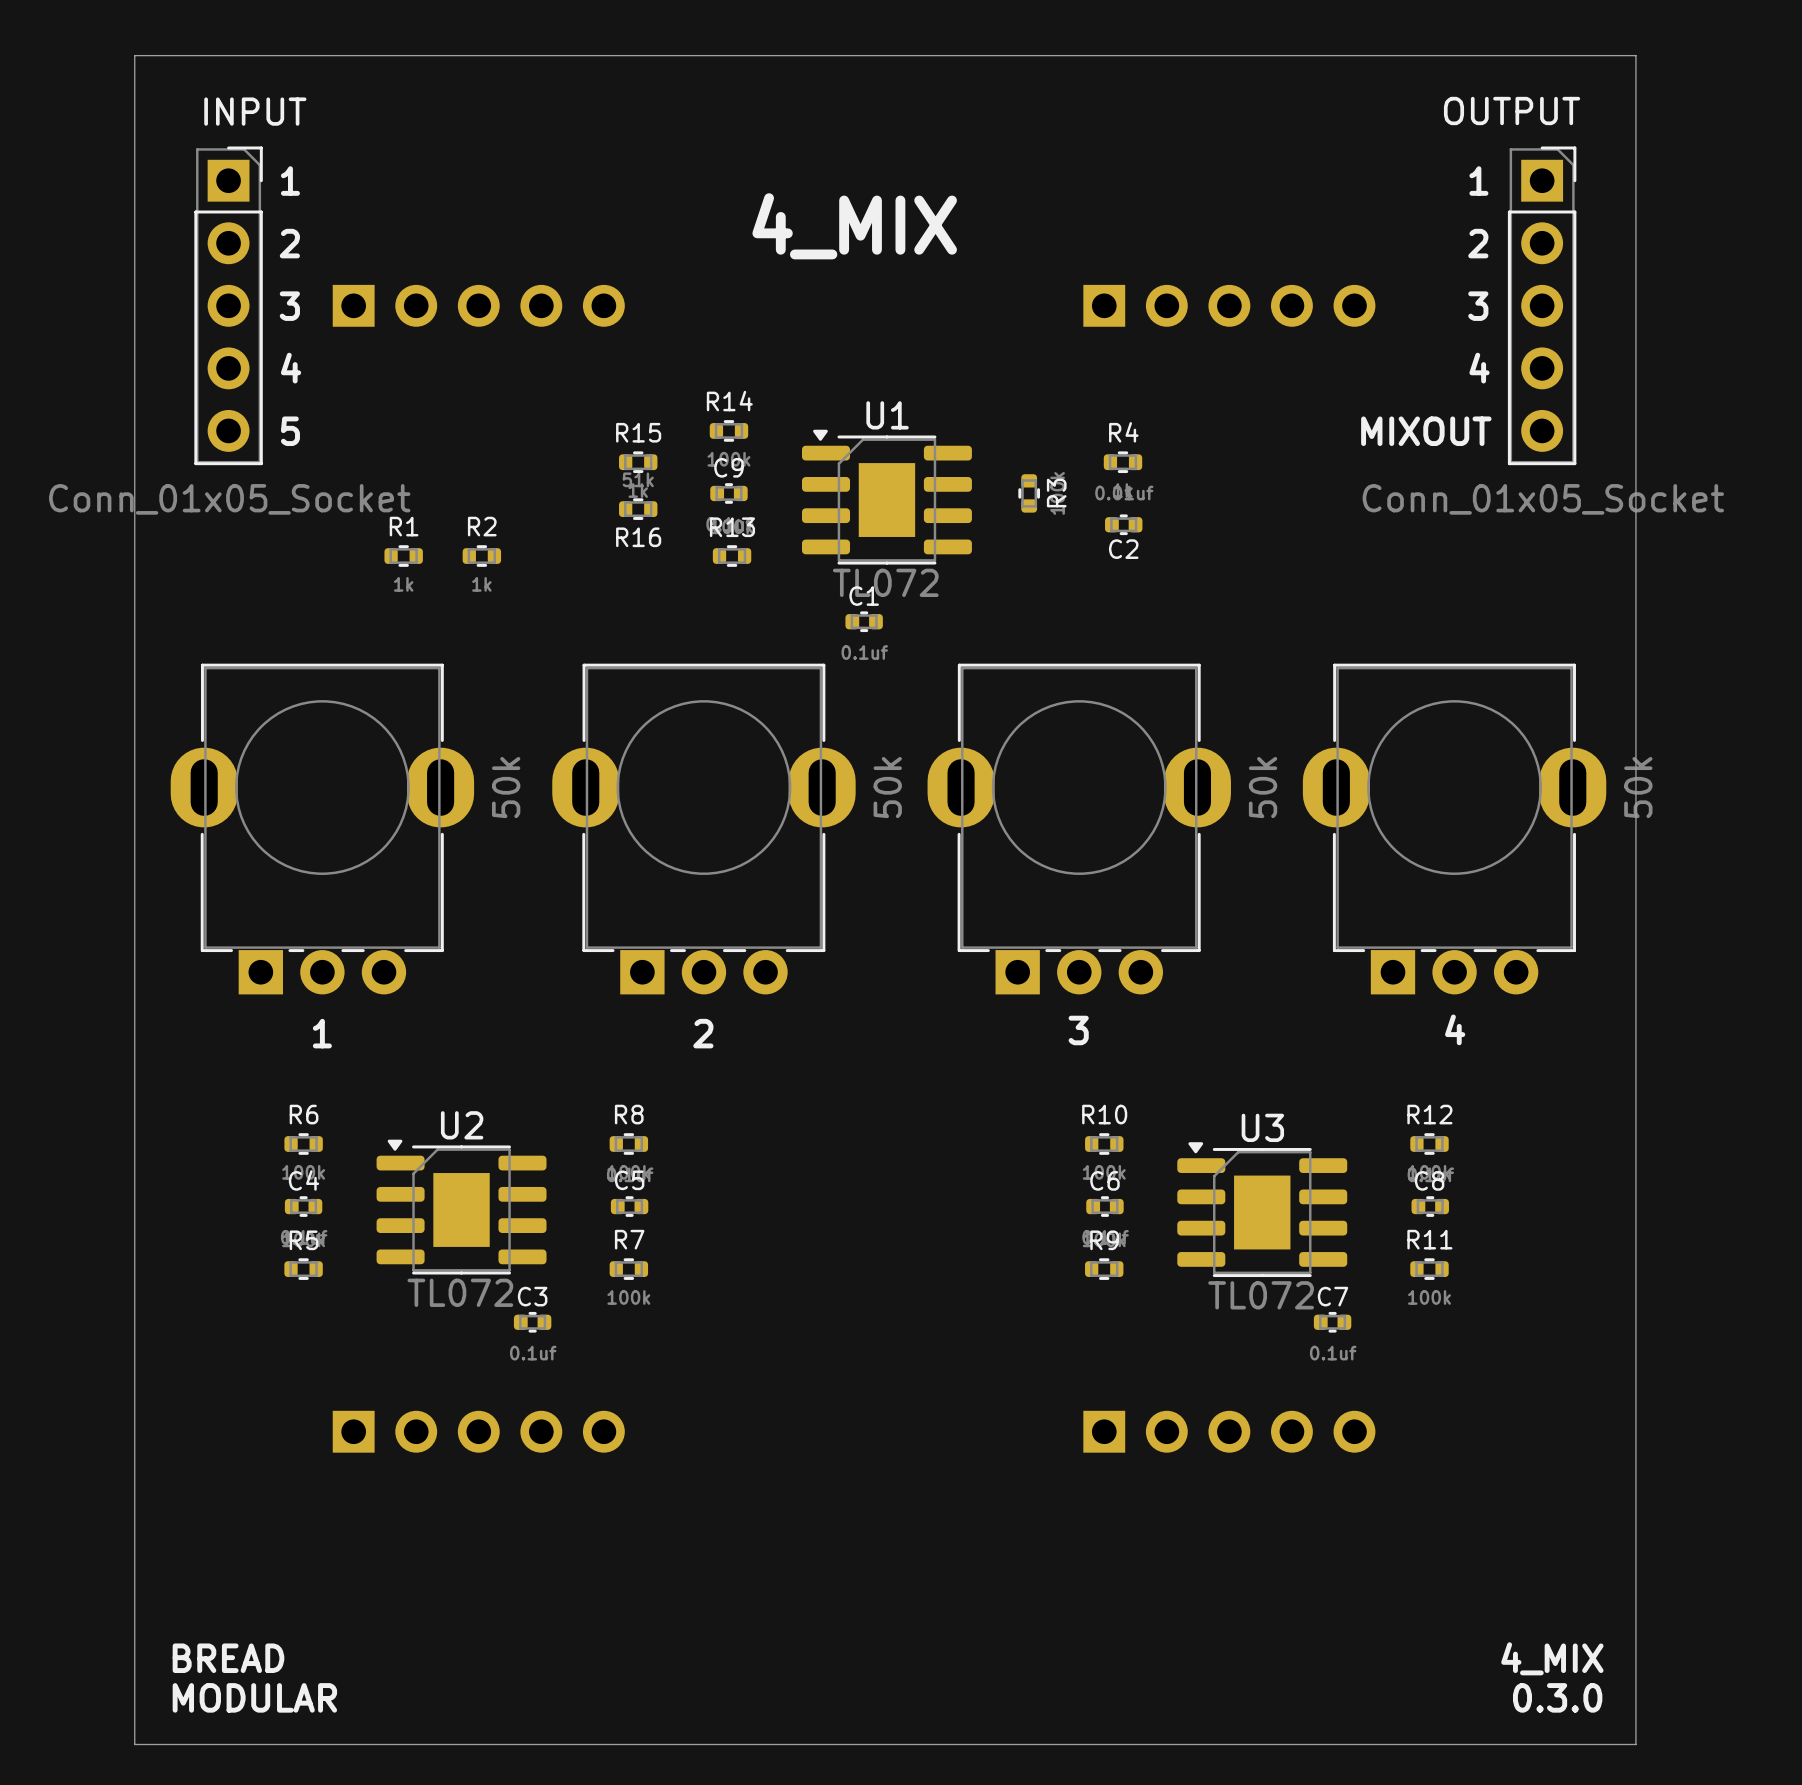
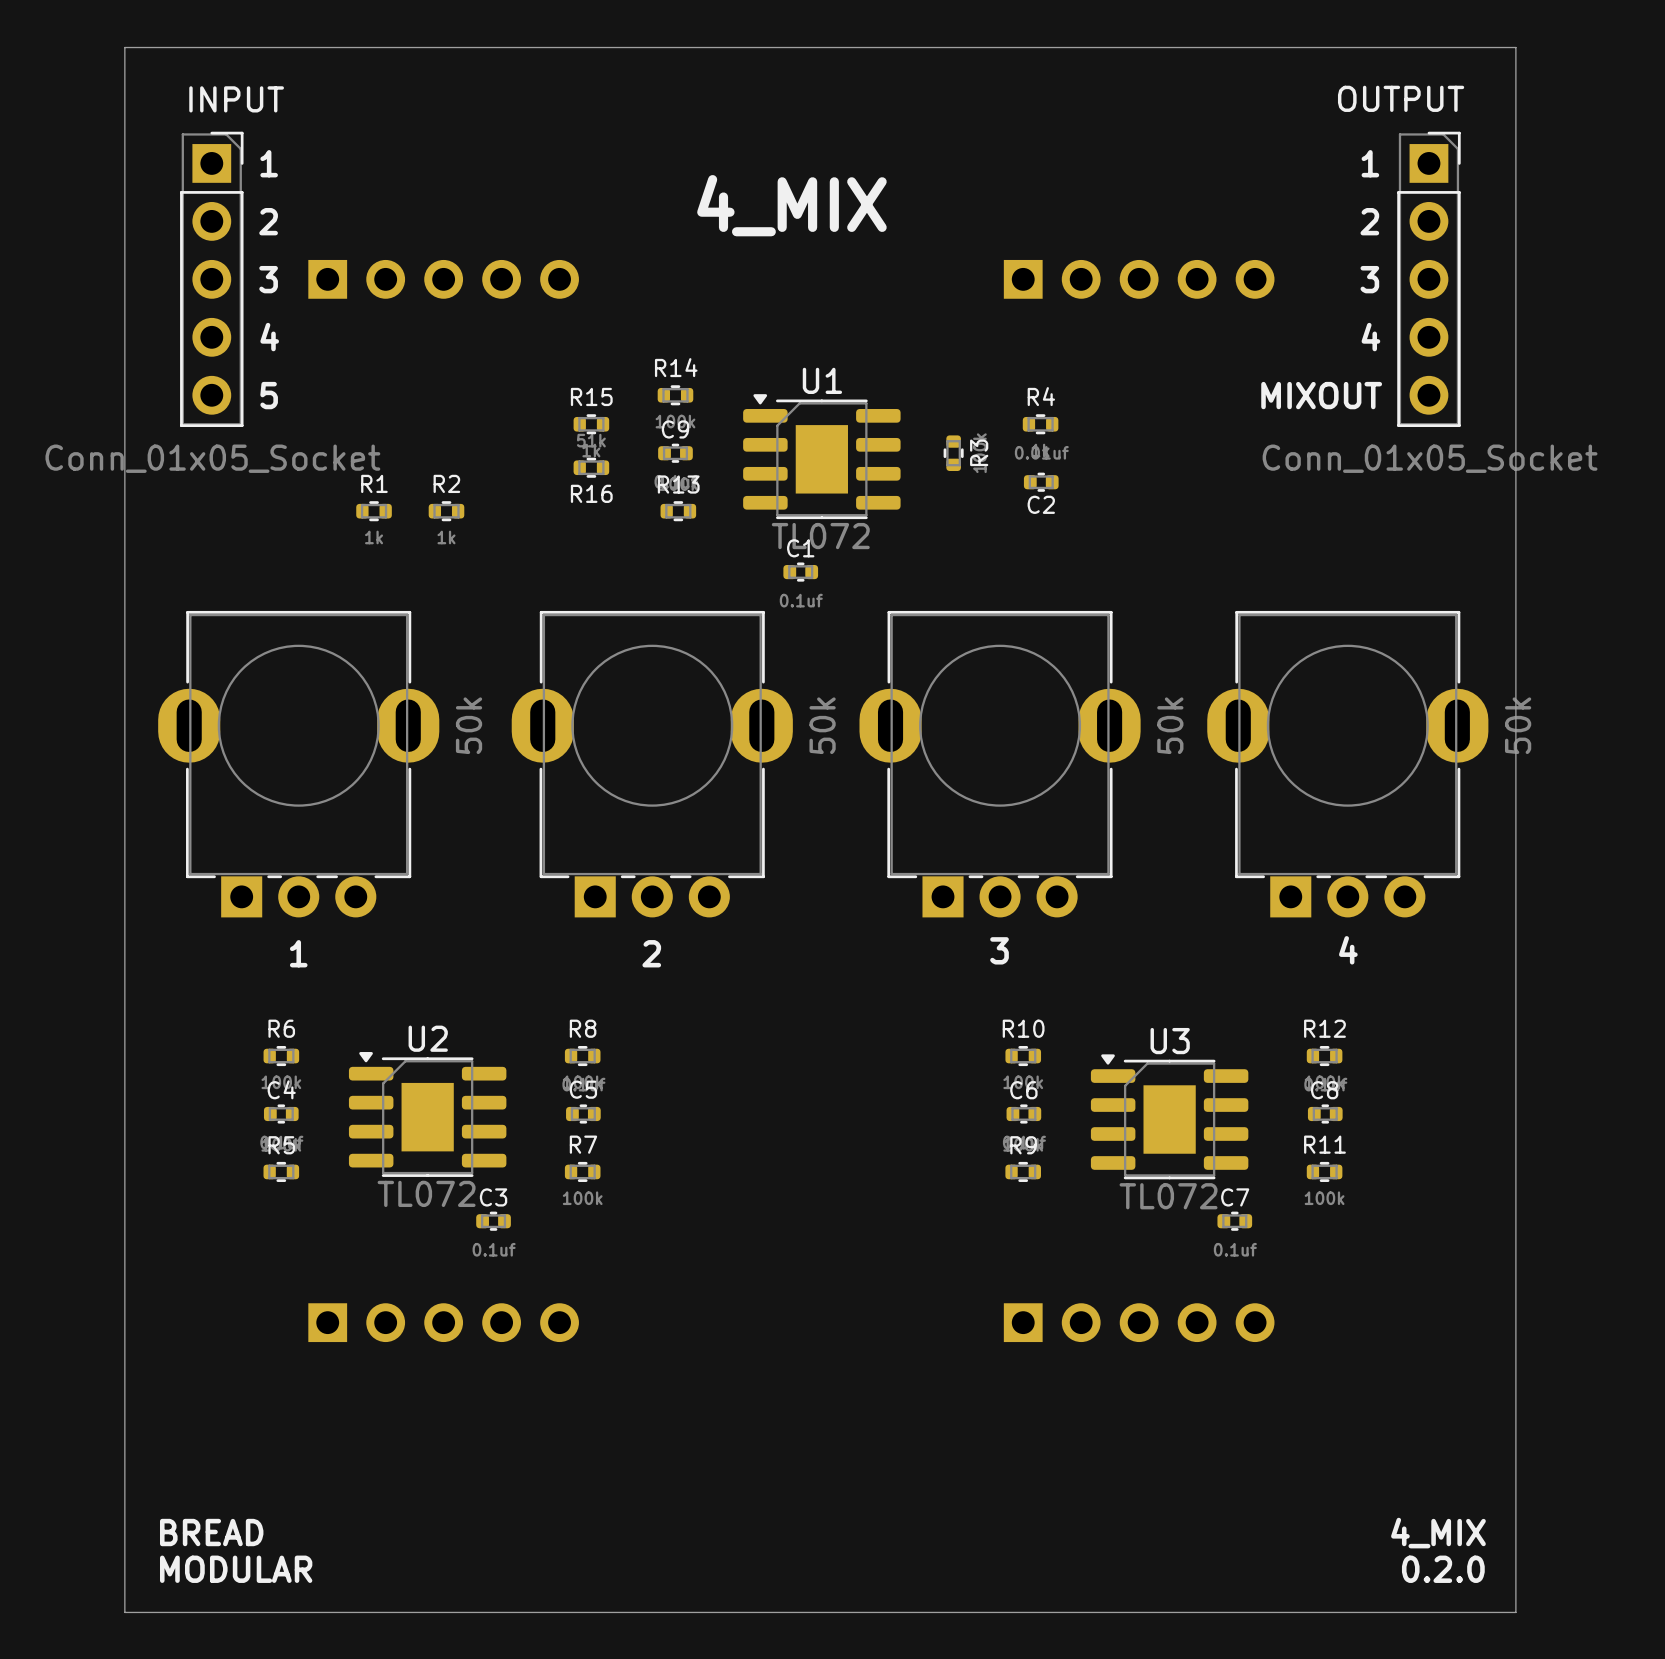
text: 0.3.0 (1557, 1697) -> 0.2.0 (1443, 1569)

